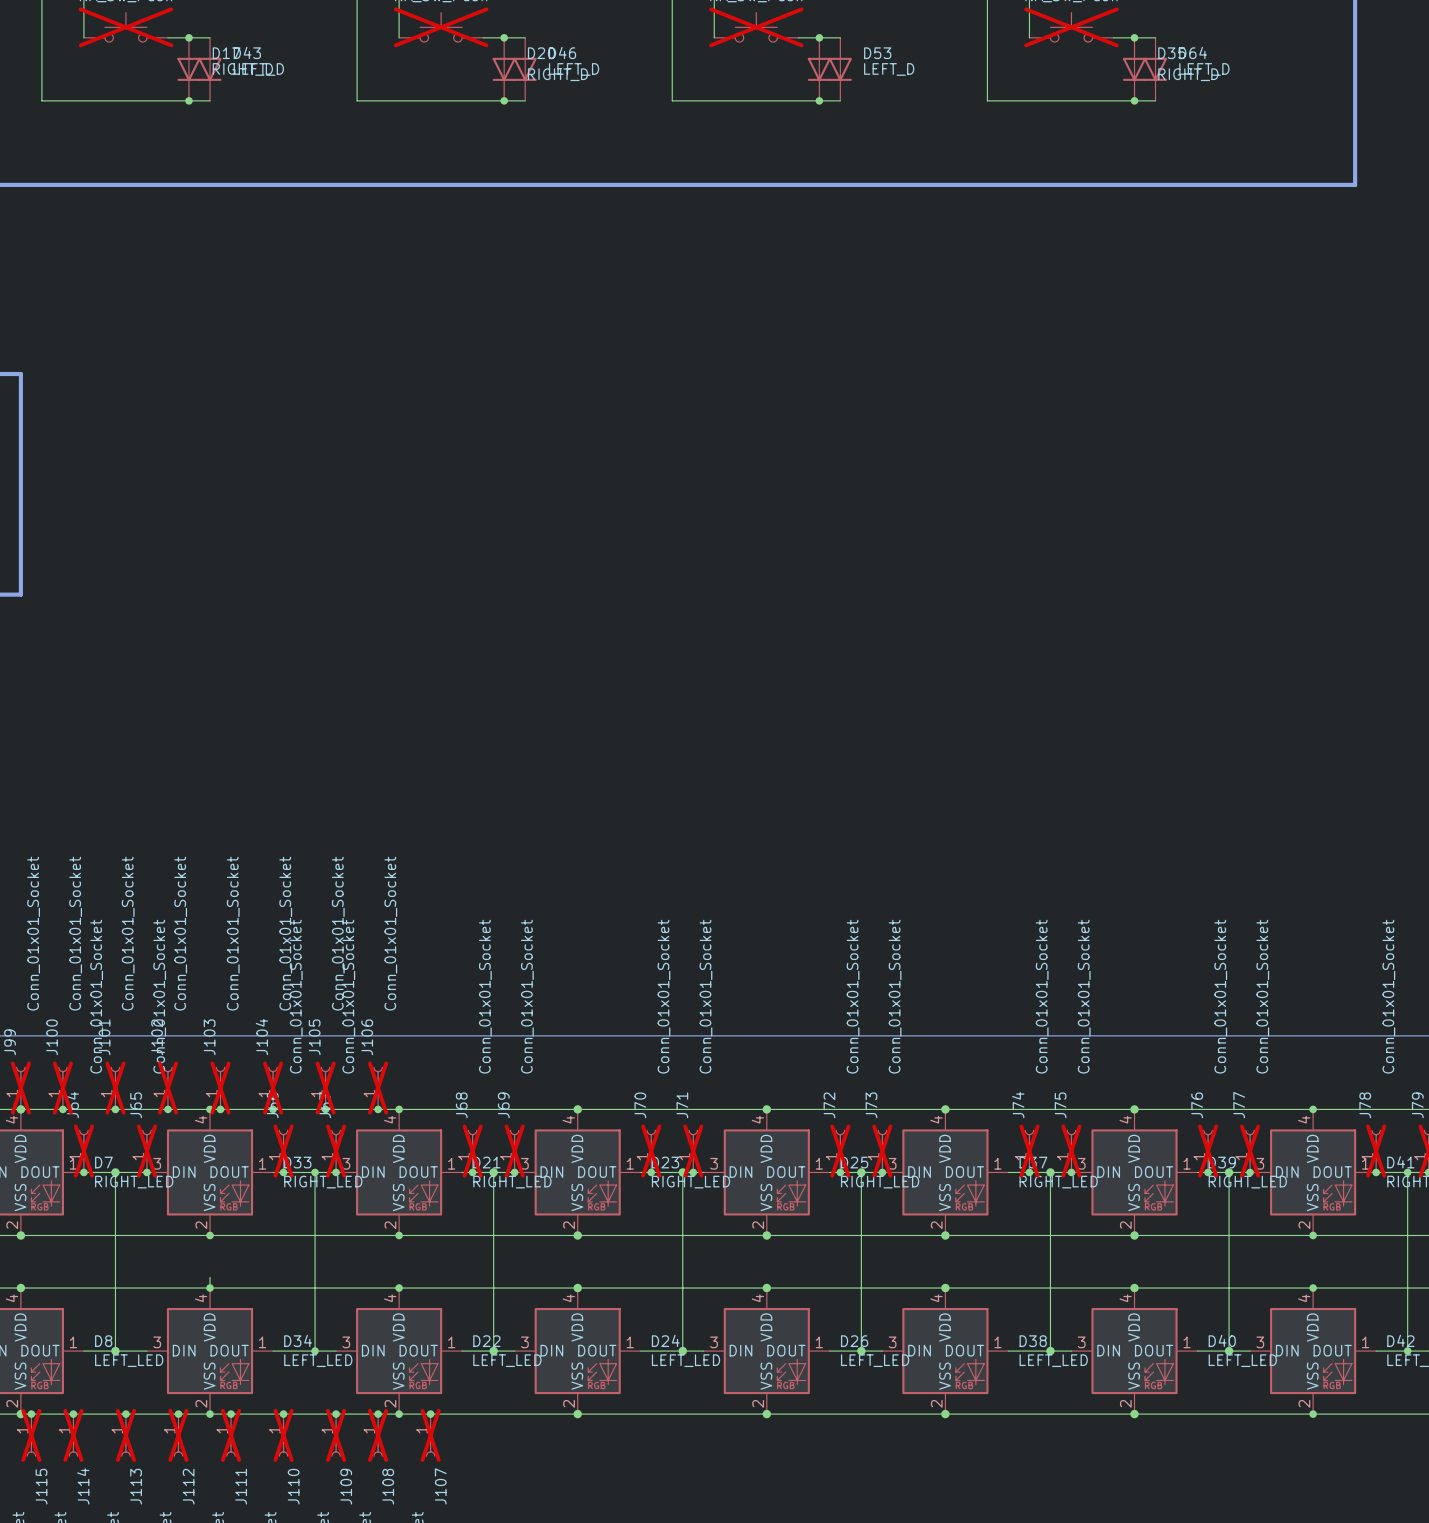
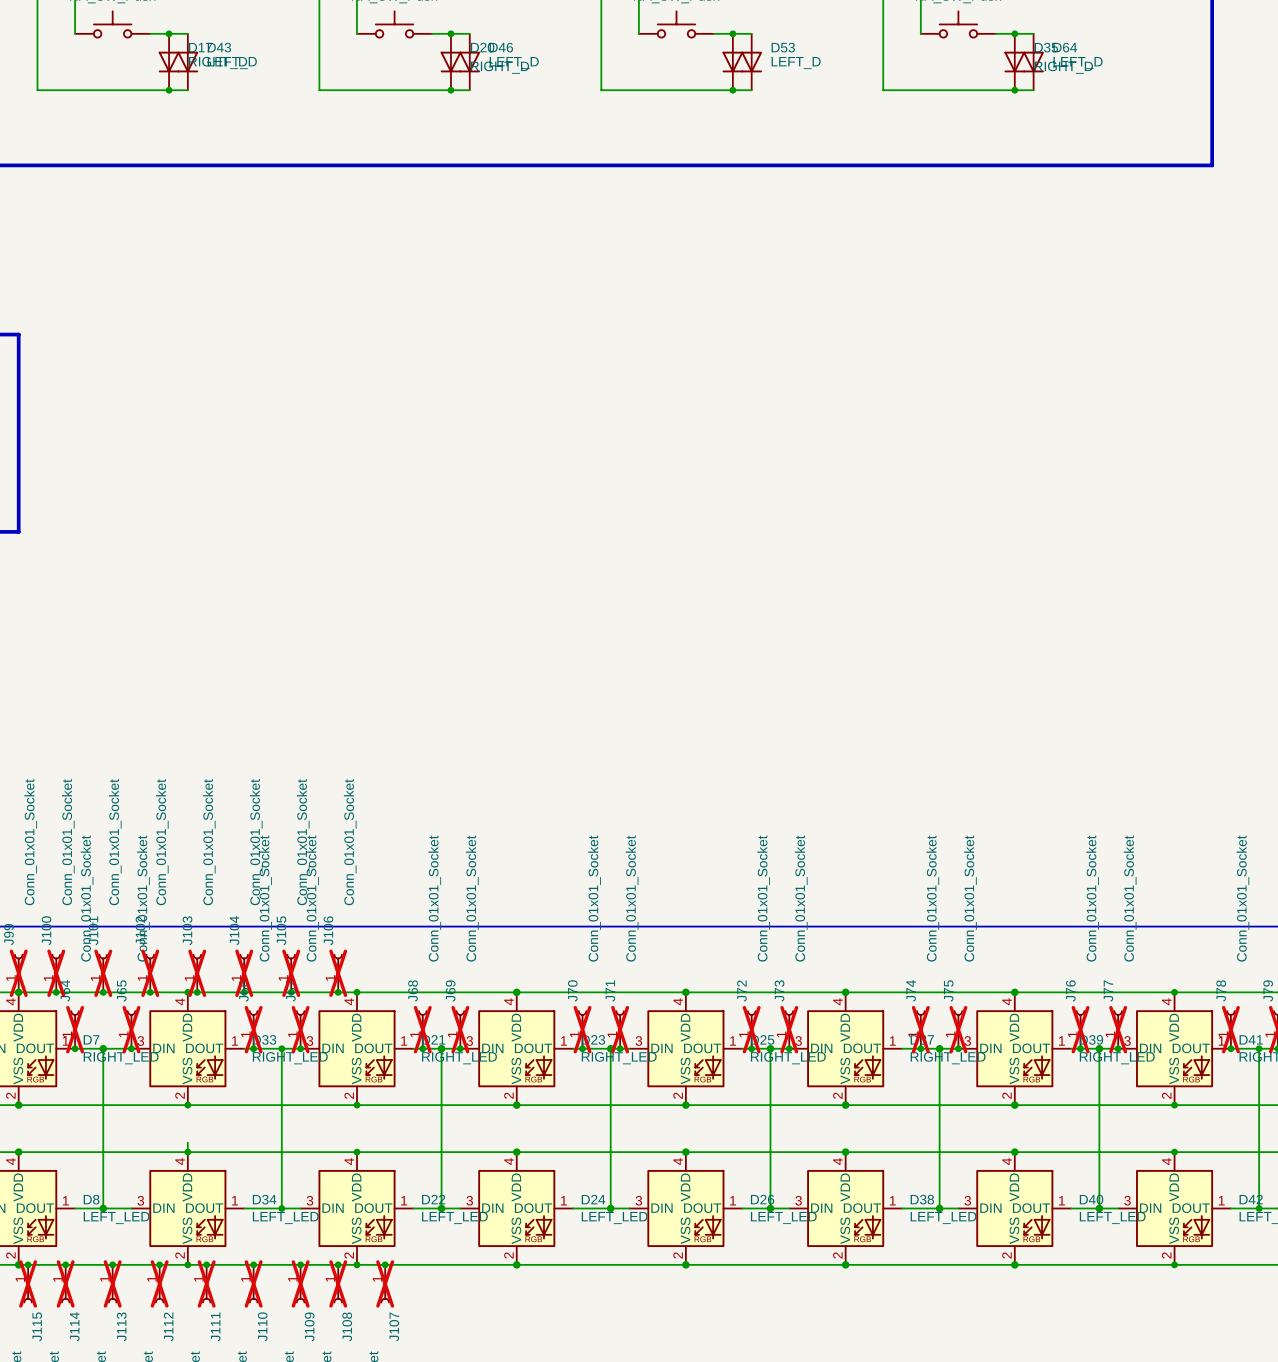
part do-not-place cross: (125, 27) -> none
part do-not-place cross: (441, 27) -> none
part do-not-place cross: (756, 27) -> none
part do-not-place cross: (1071, 27) -> none

